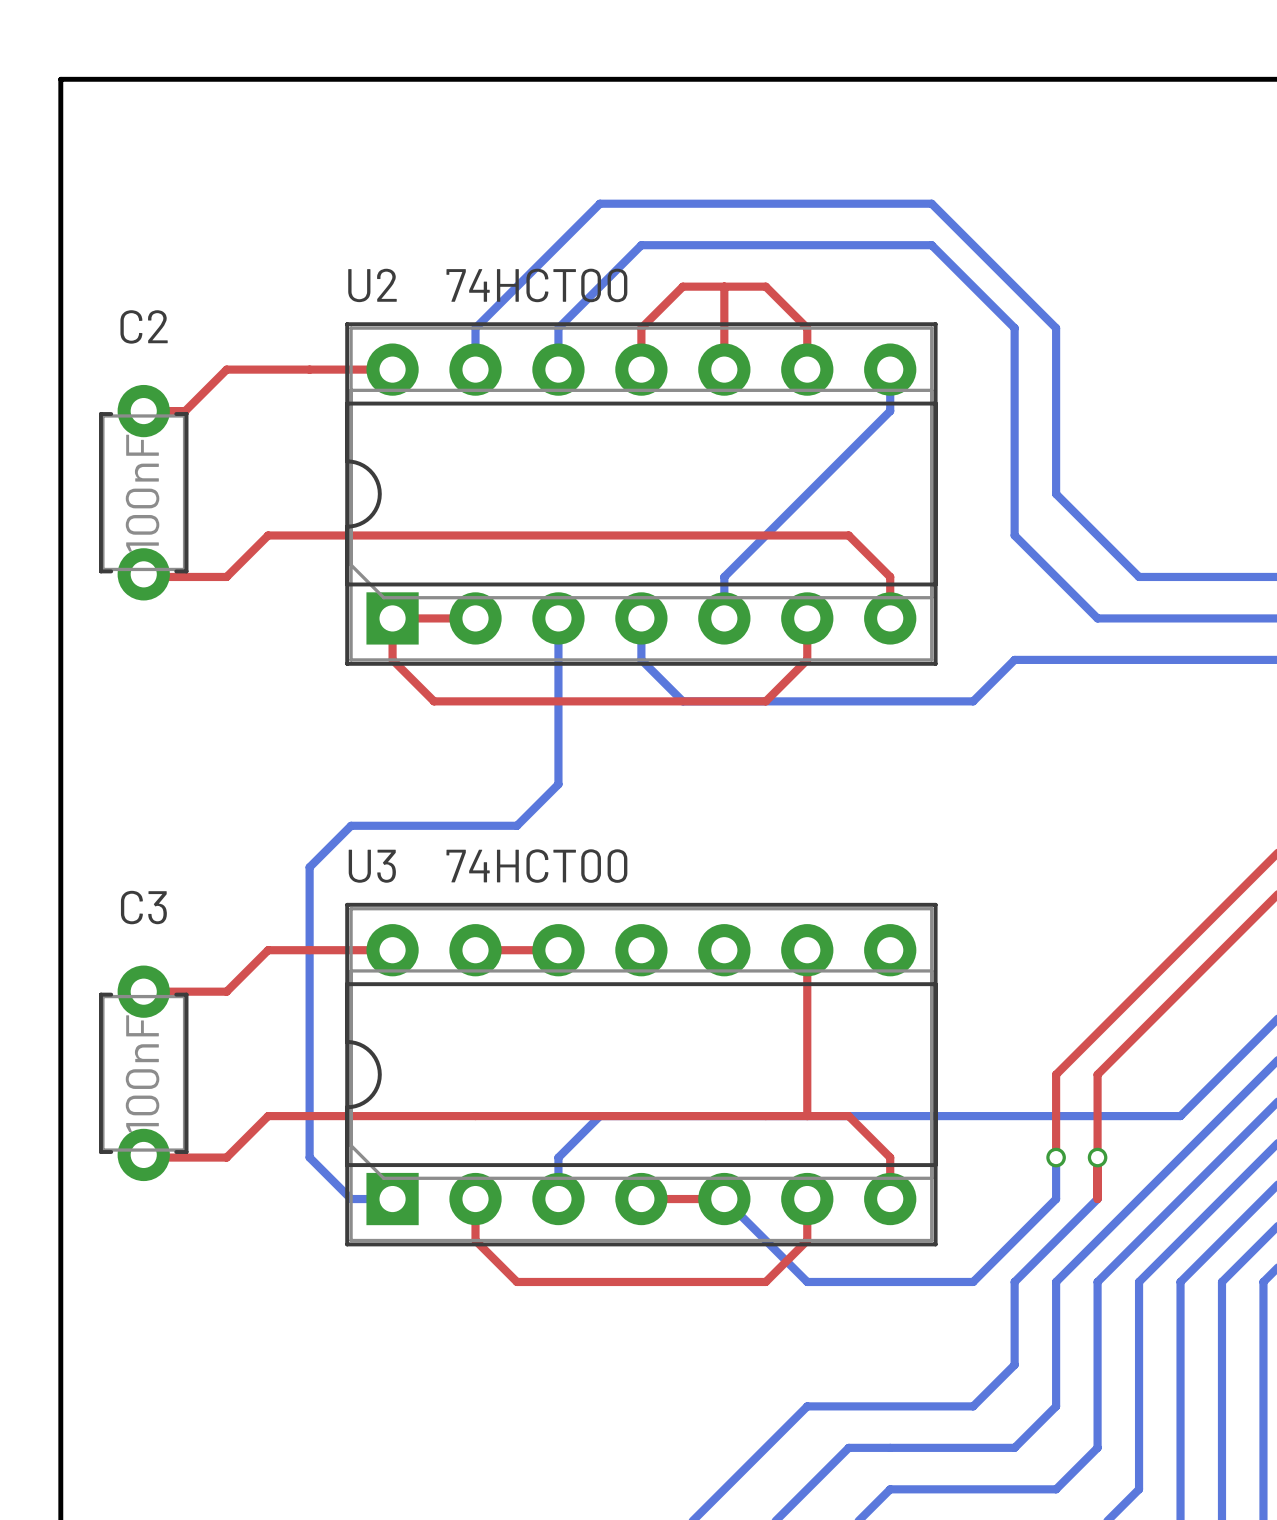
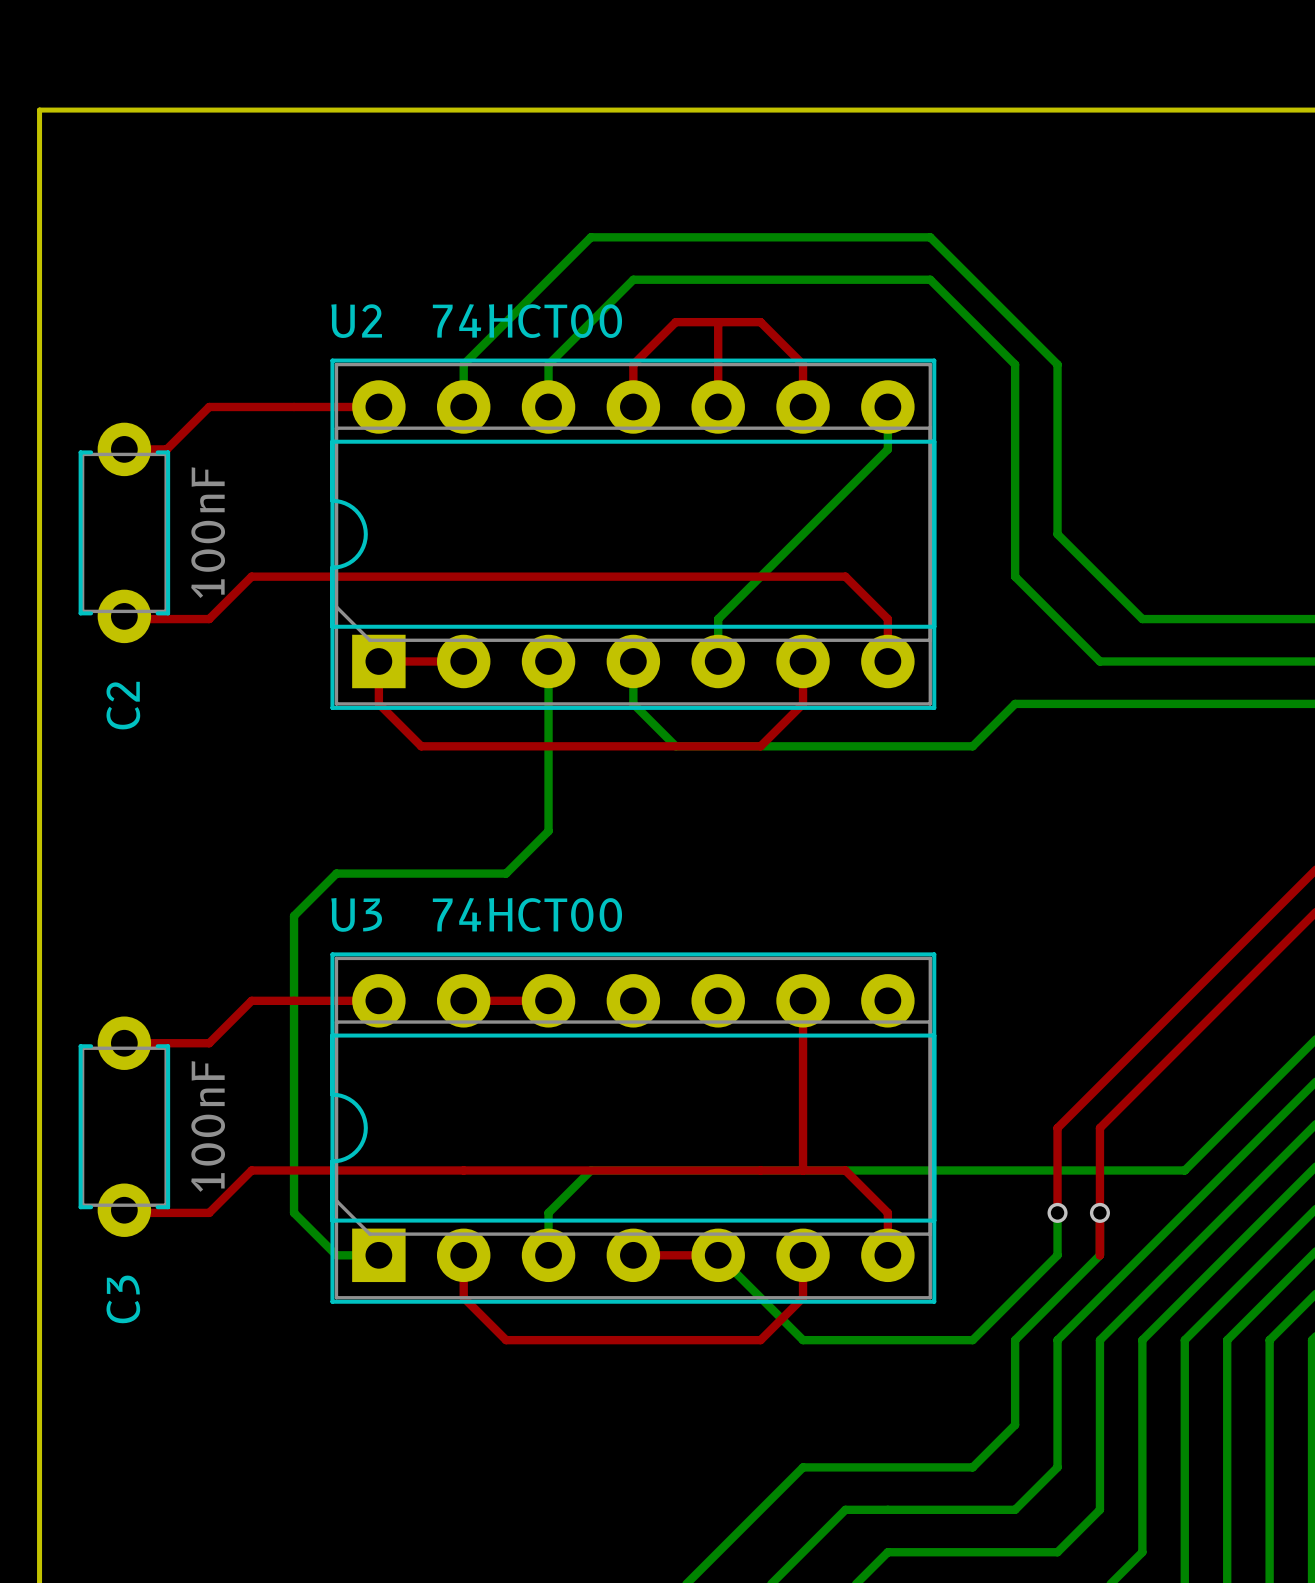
C2 name rotation: 0° (144, 326) -> 90° counterclockwise (123, 705)
C2 name position: C2 (144, 326) -> C2 (123, 705)
C2 value position: 100nF (142, 493) -> 100nF (208, 532)
C3 name rotation: 0° (143, 907) -> 90° counterclockwise (123, 1299)
C3 name position: C3 (143, 907) -> C3 (123, 1299)
C3 value position: 100nF (142, 1073) -> 100nF (208, 1126)

